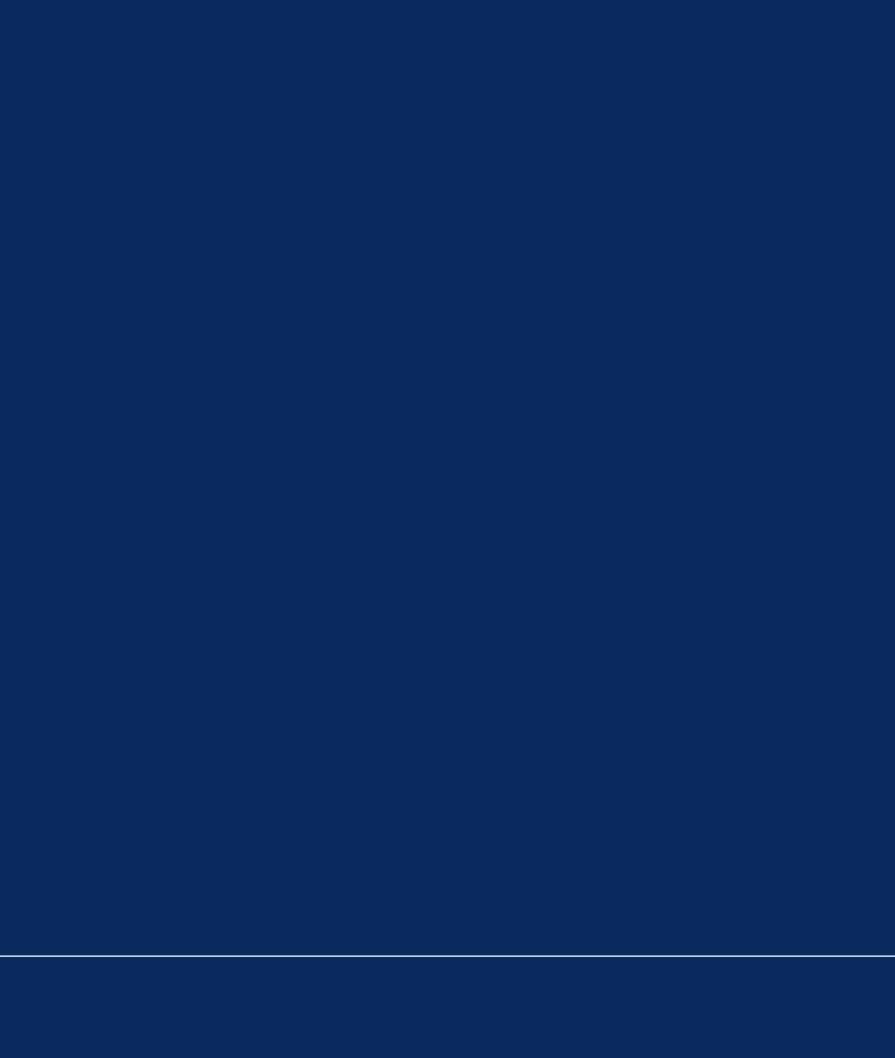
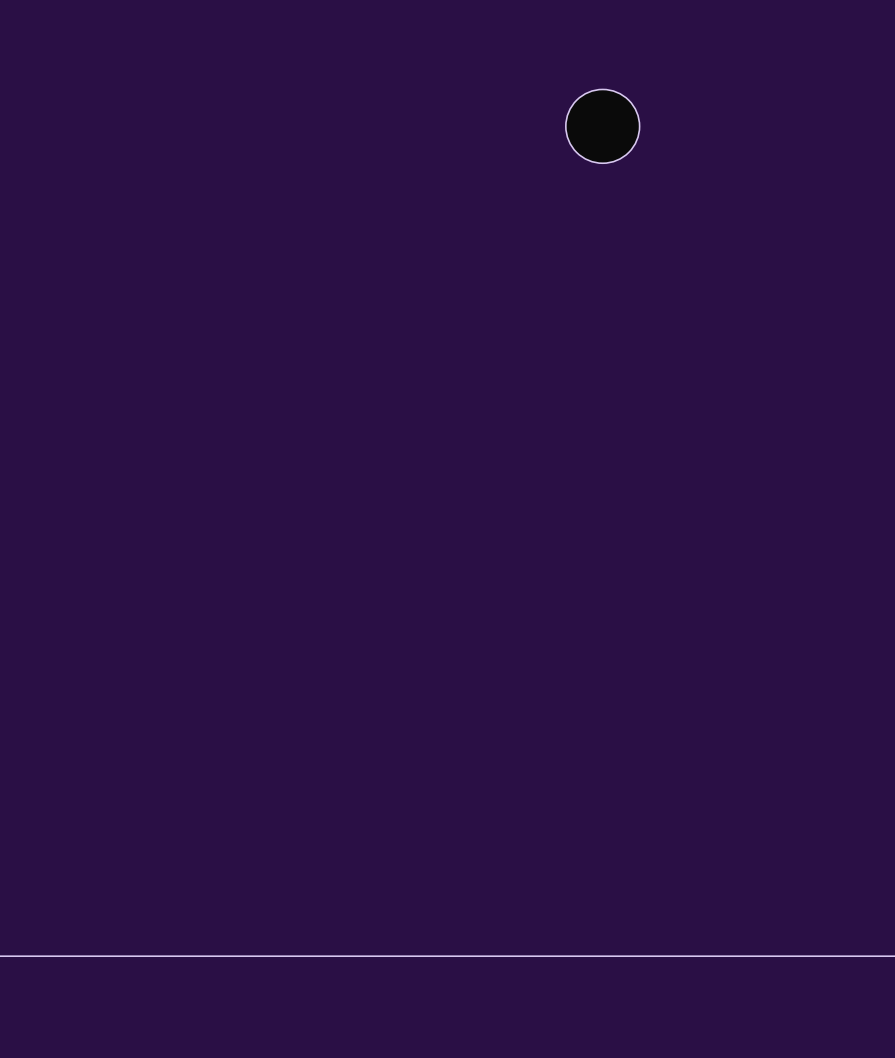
hole: none -> (602, 126)

